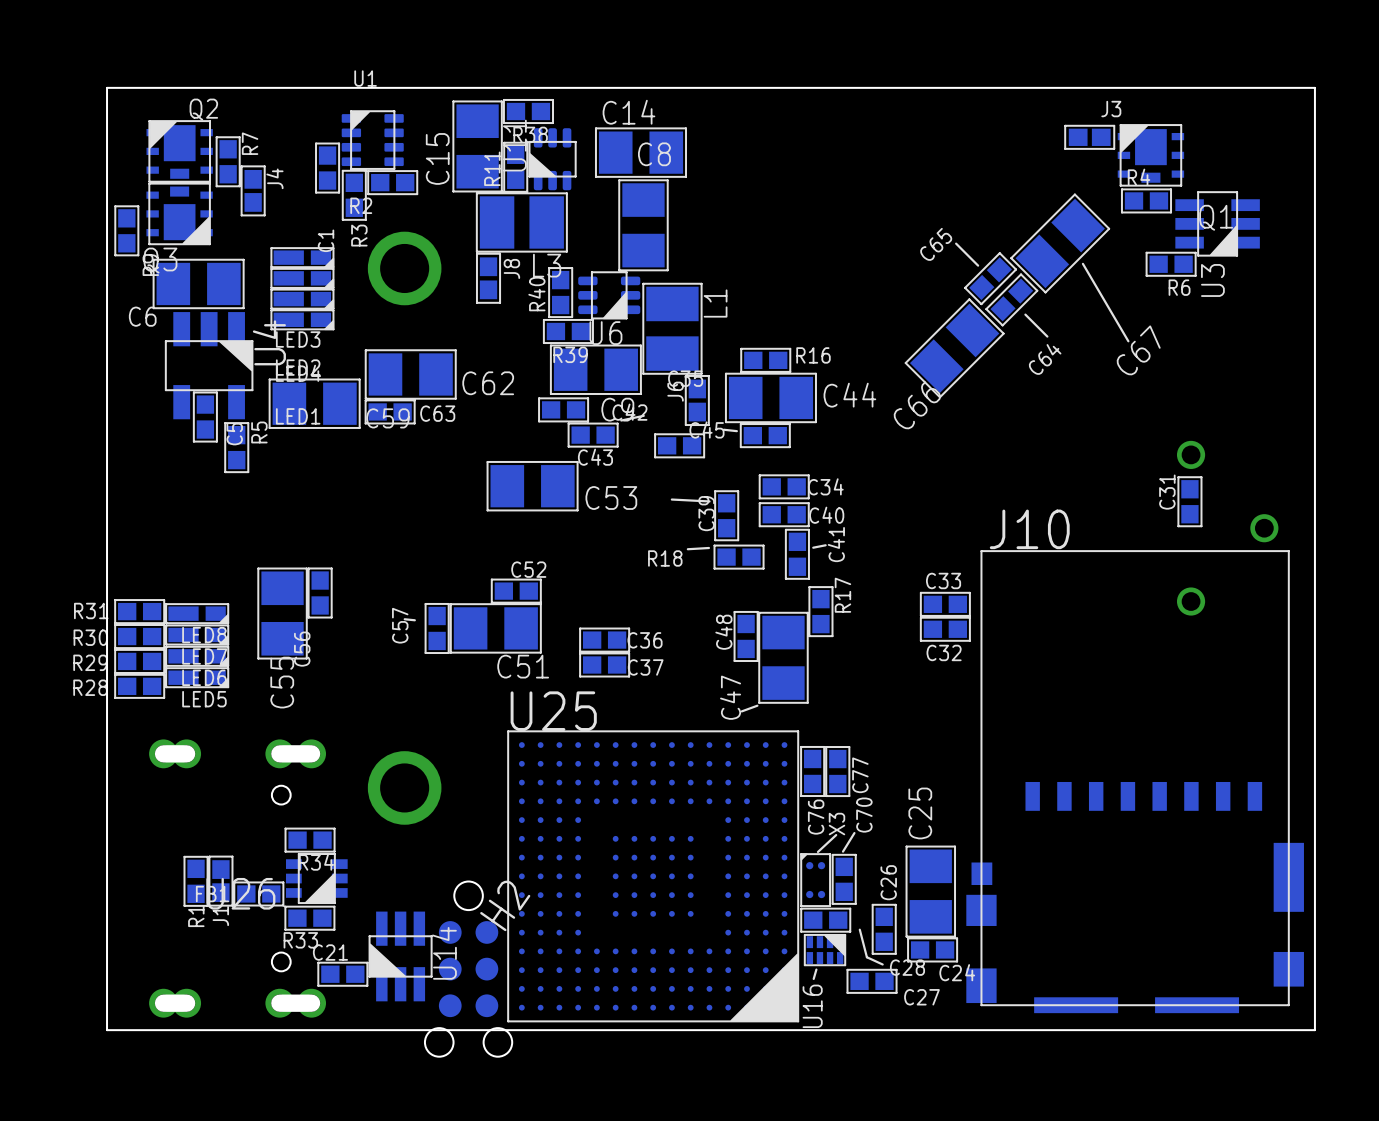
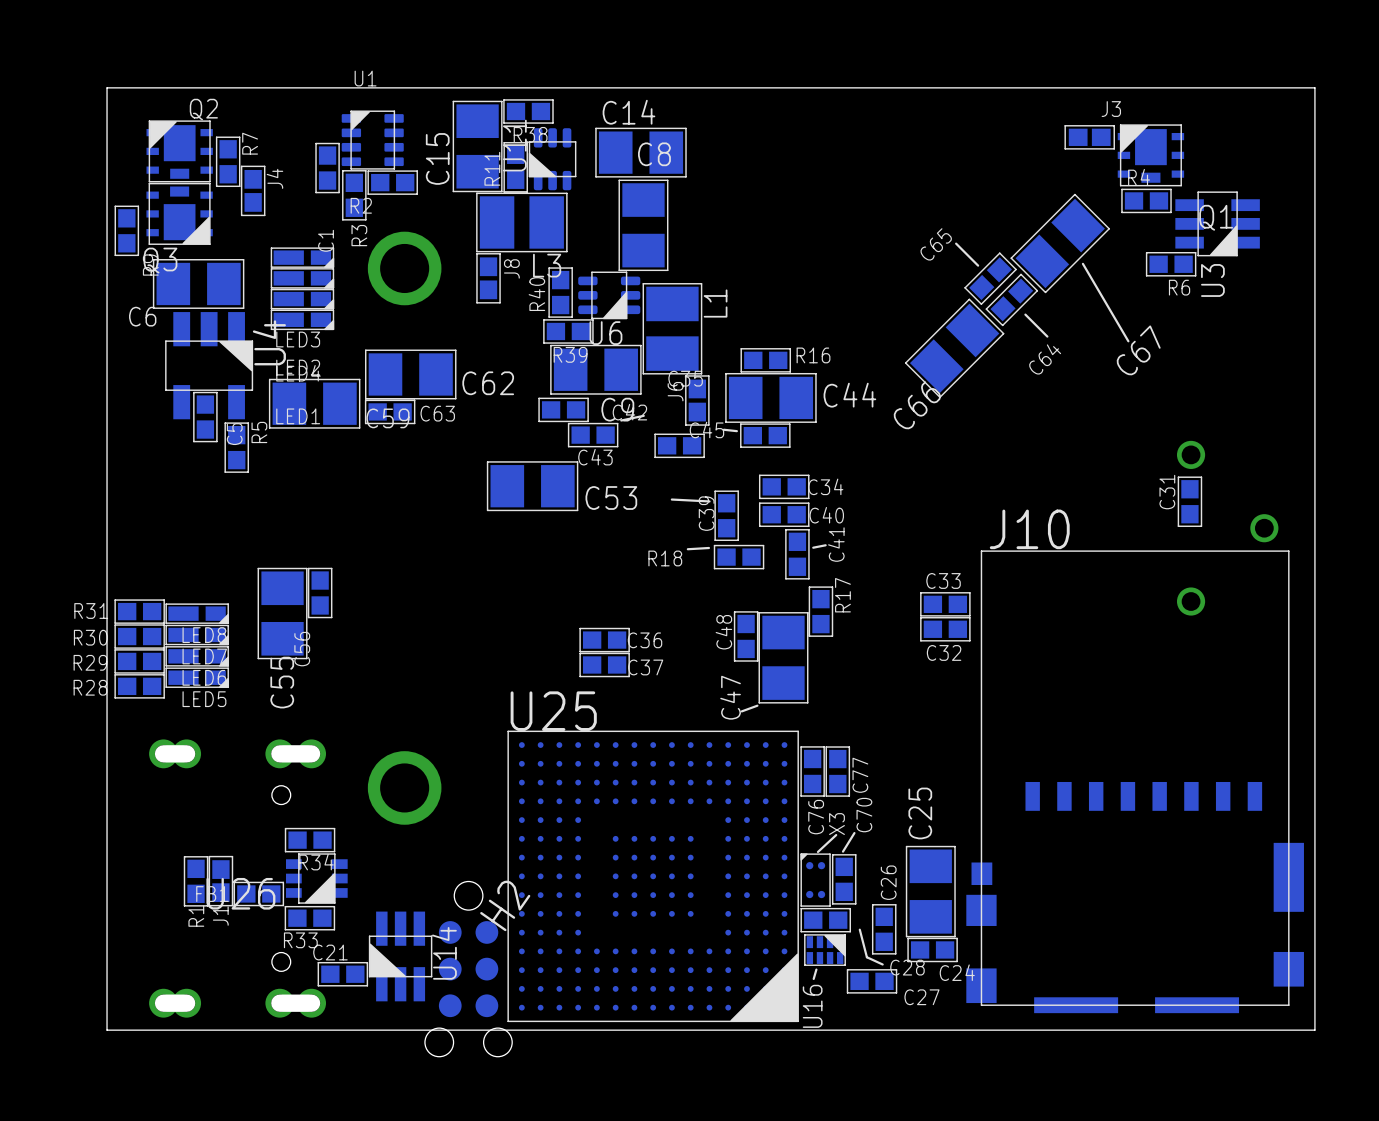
C52: (516, 591) -> none
line: (404, 619) (414, 620) -> none
C57: (437, 628) -> none
C51: (495, 628) -> none

